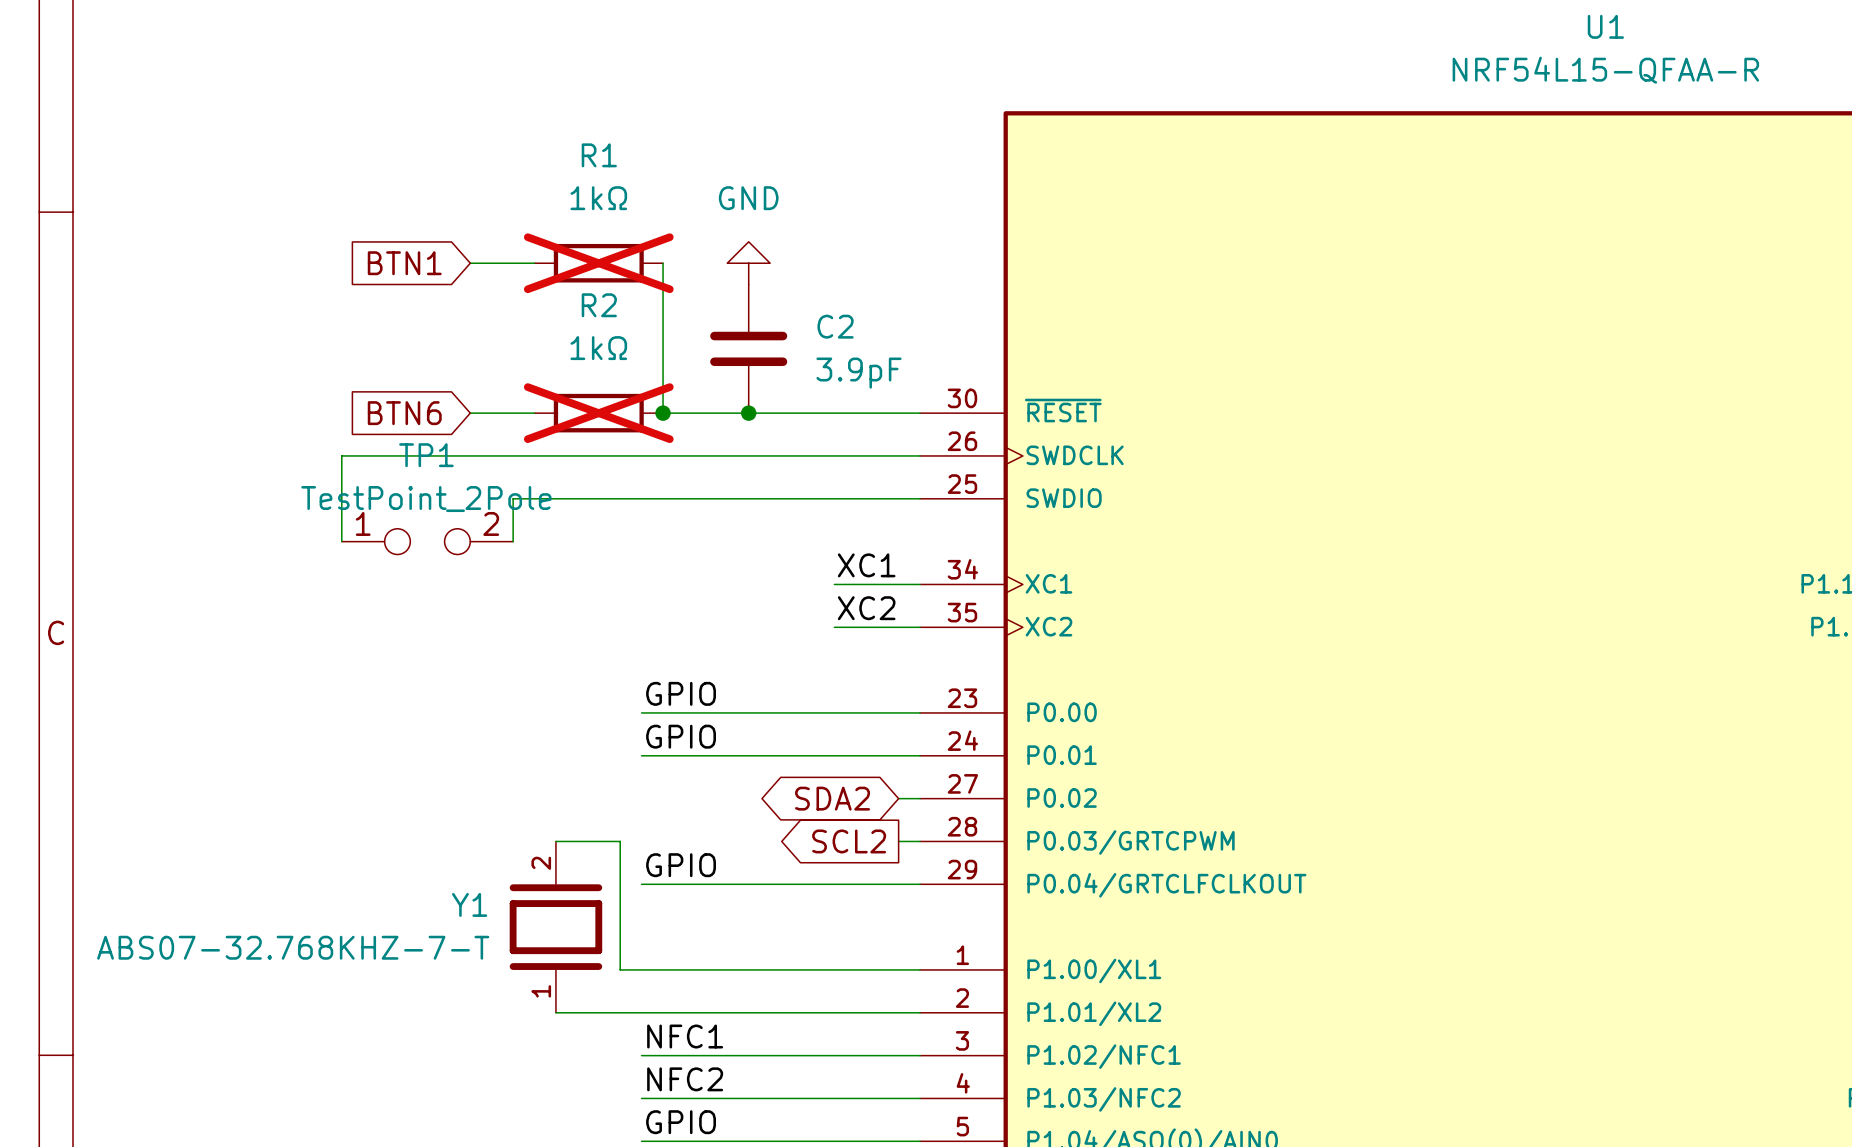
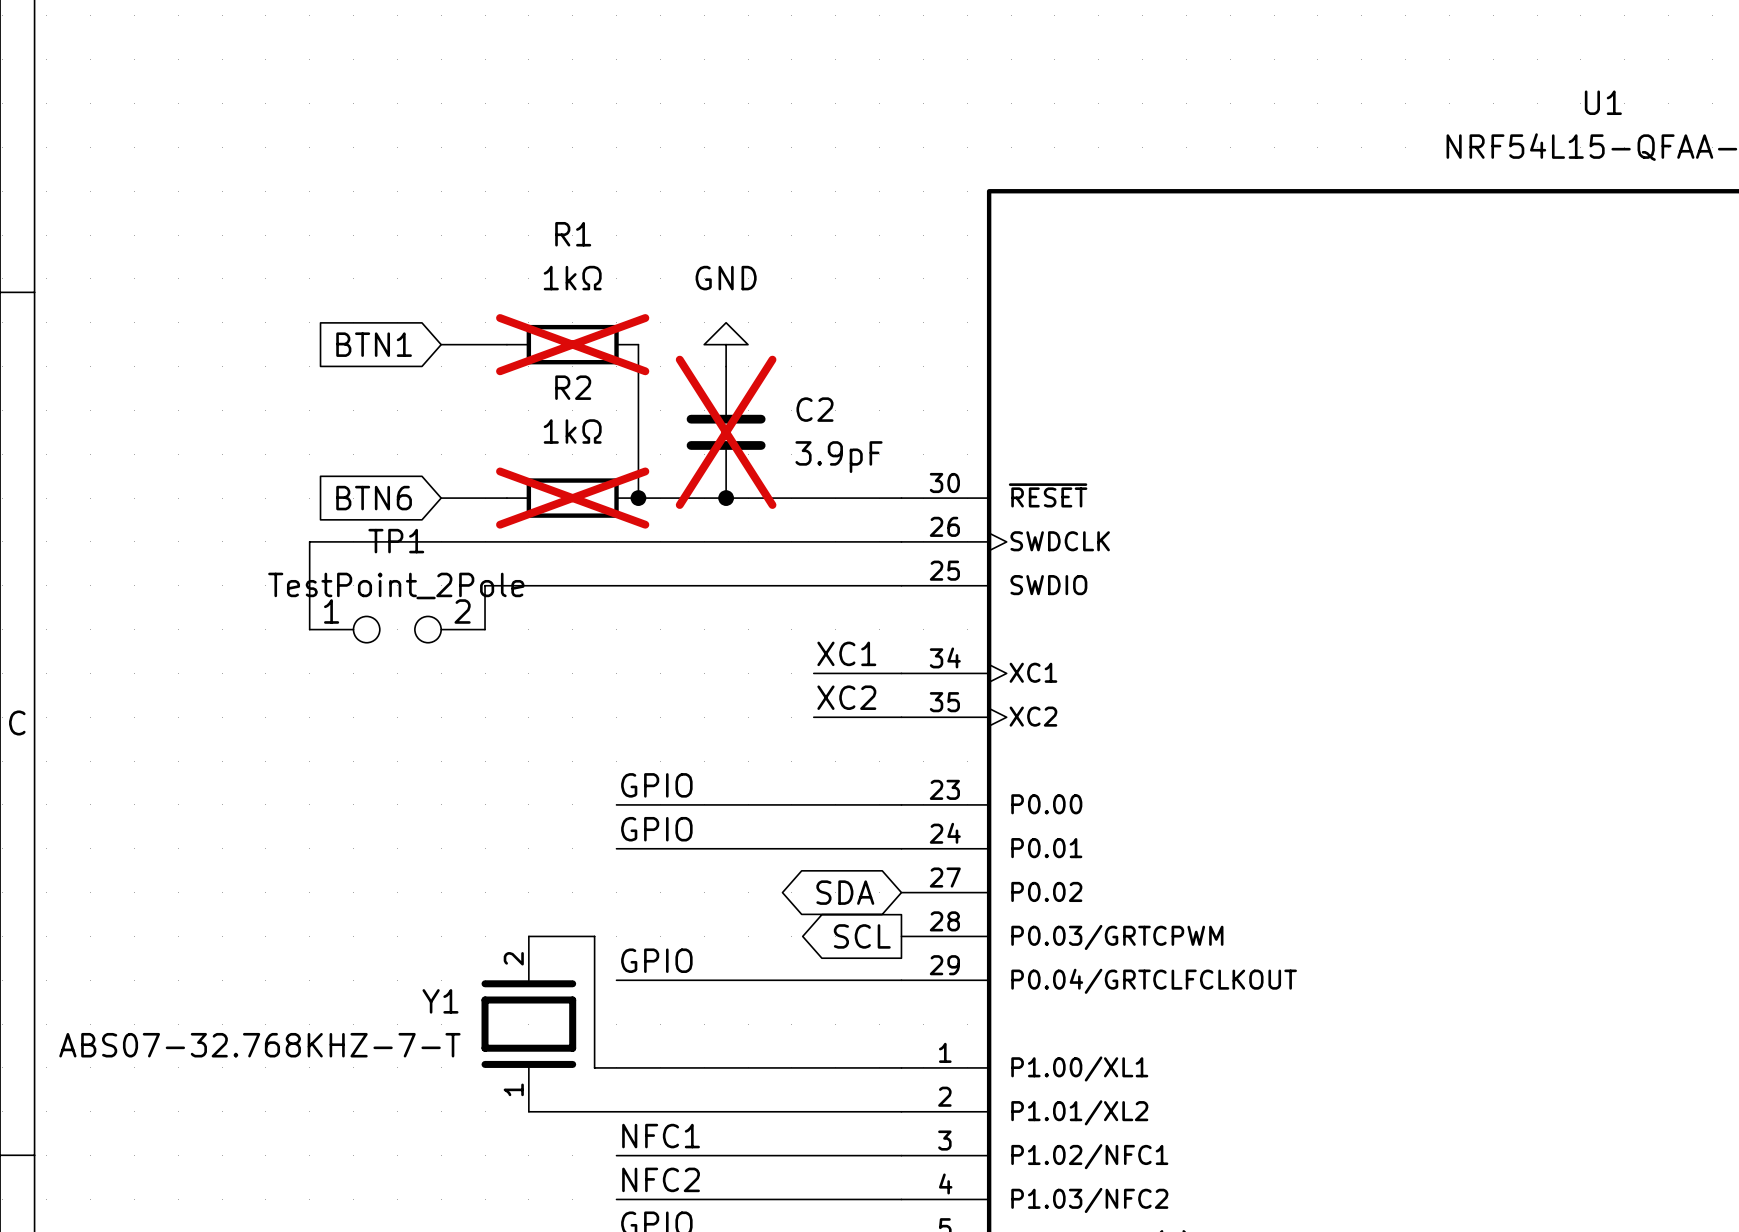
C2 do-not-place cross: none -> (726, 432)
global label: SDA2 (832, 798) -> SDA (845, 892)
wire: (898, 798) (920, 798) -> none
global label: SCL2 (849, 841) -> SCL (862, 936)
wire: (898, 841) (920, 841) -> none

